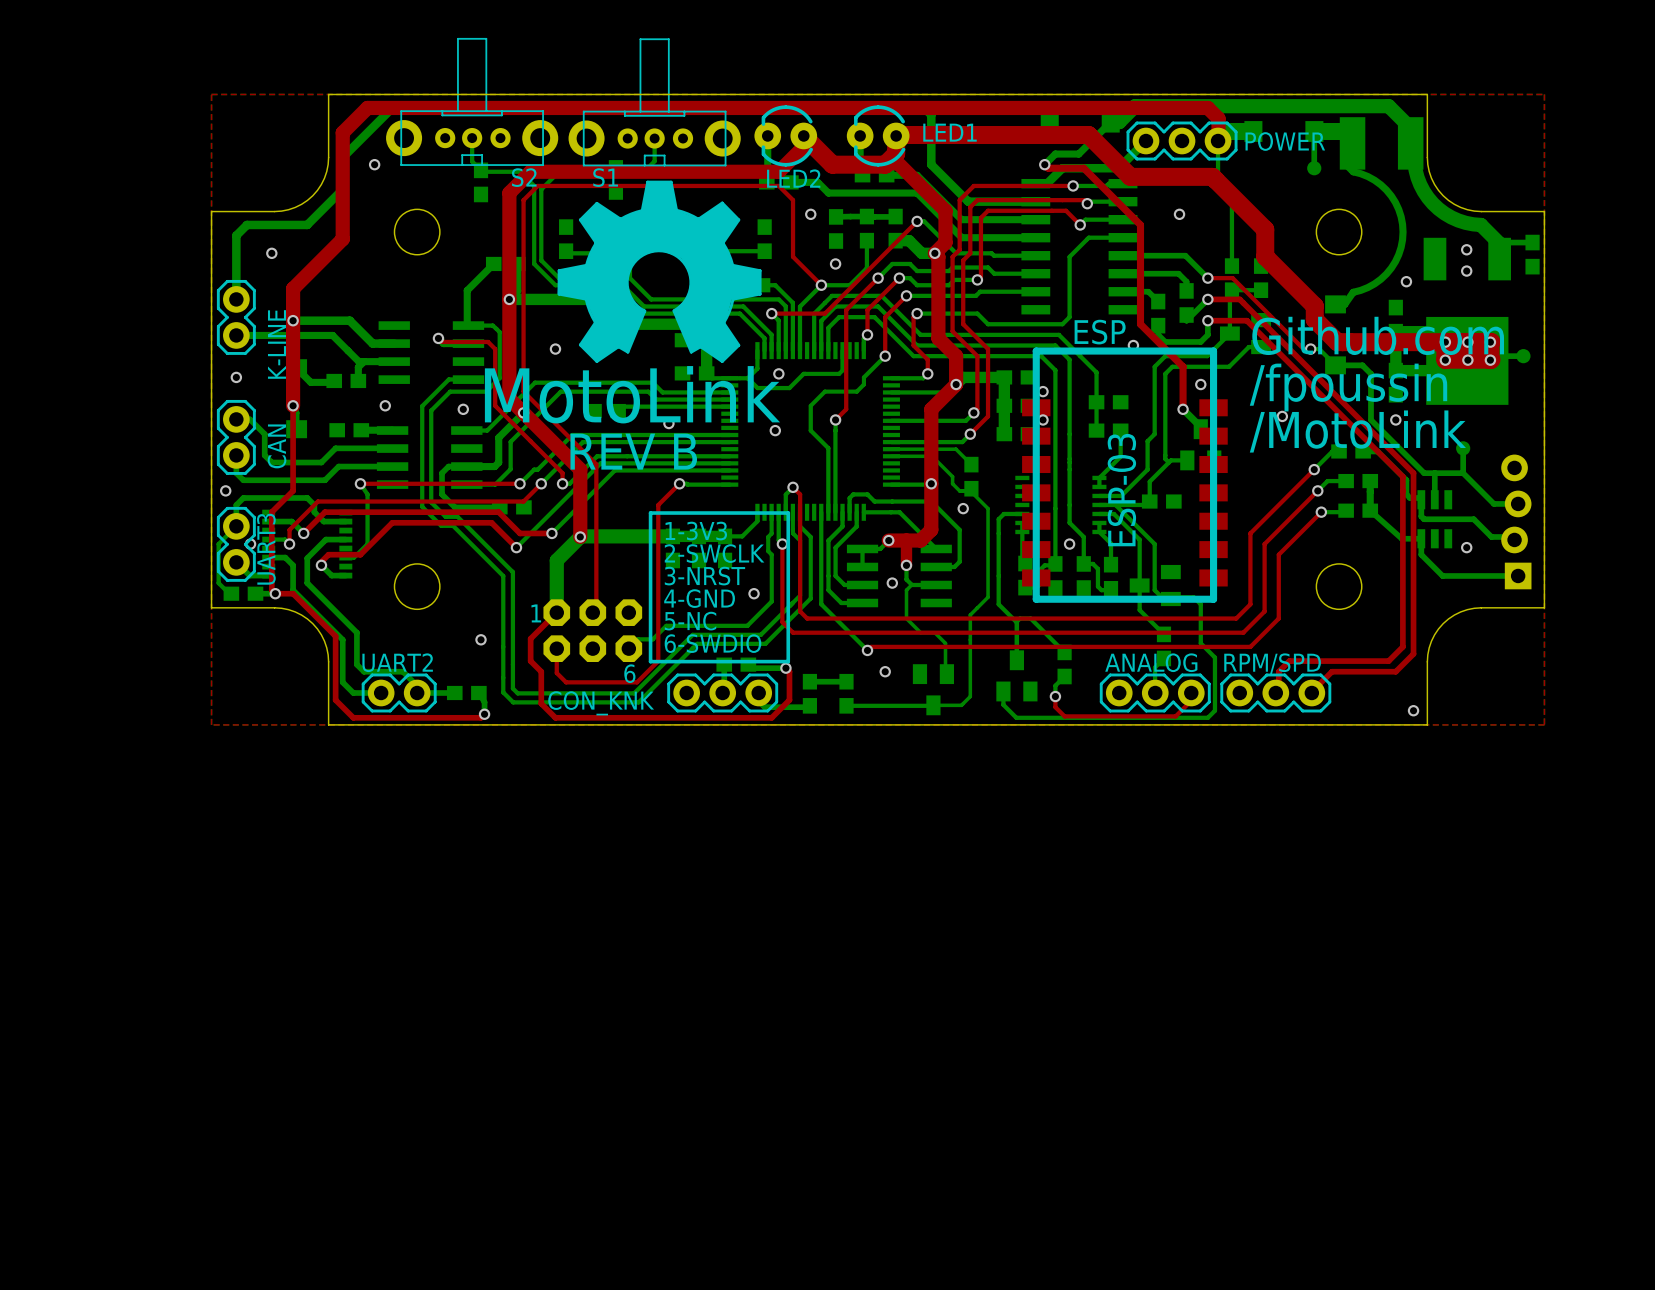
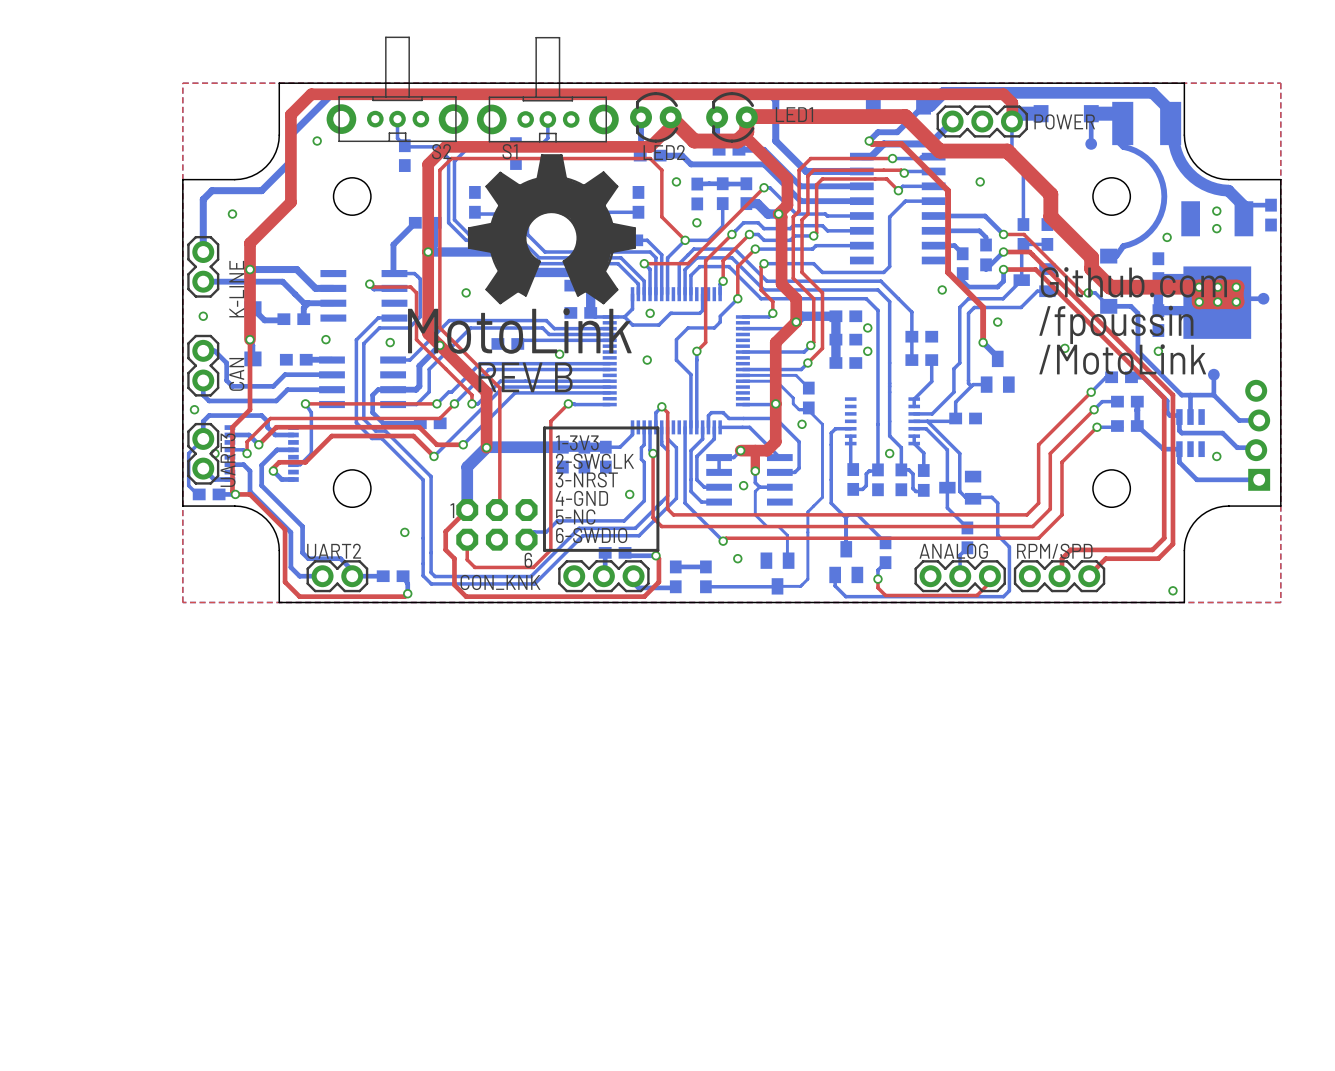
ESP: (1124, 475) -> none

